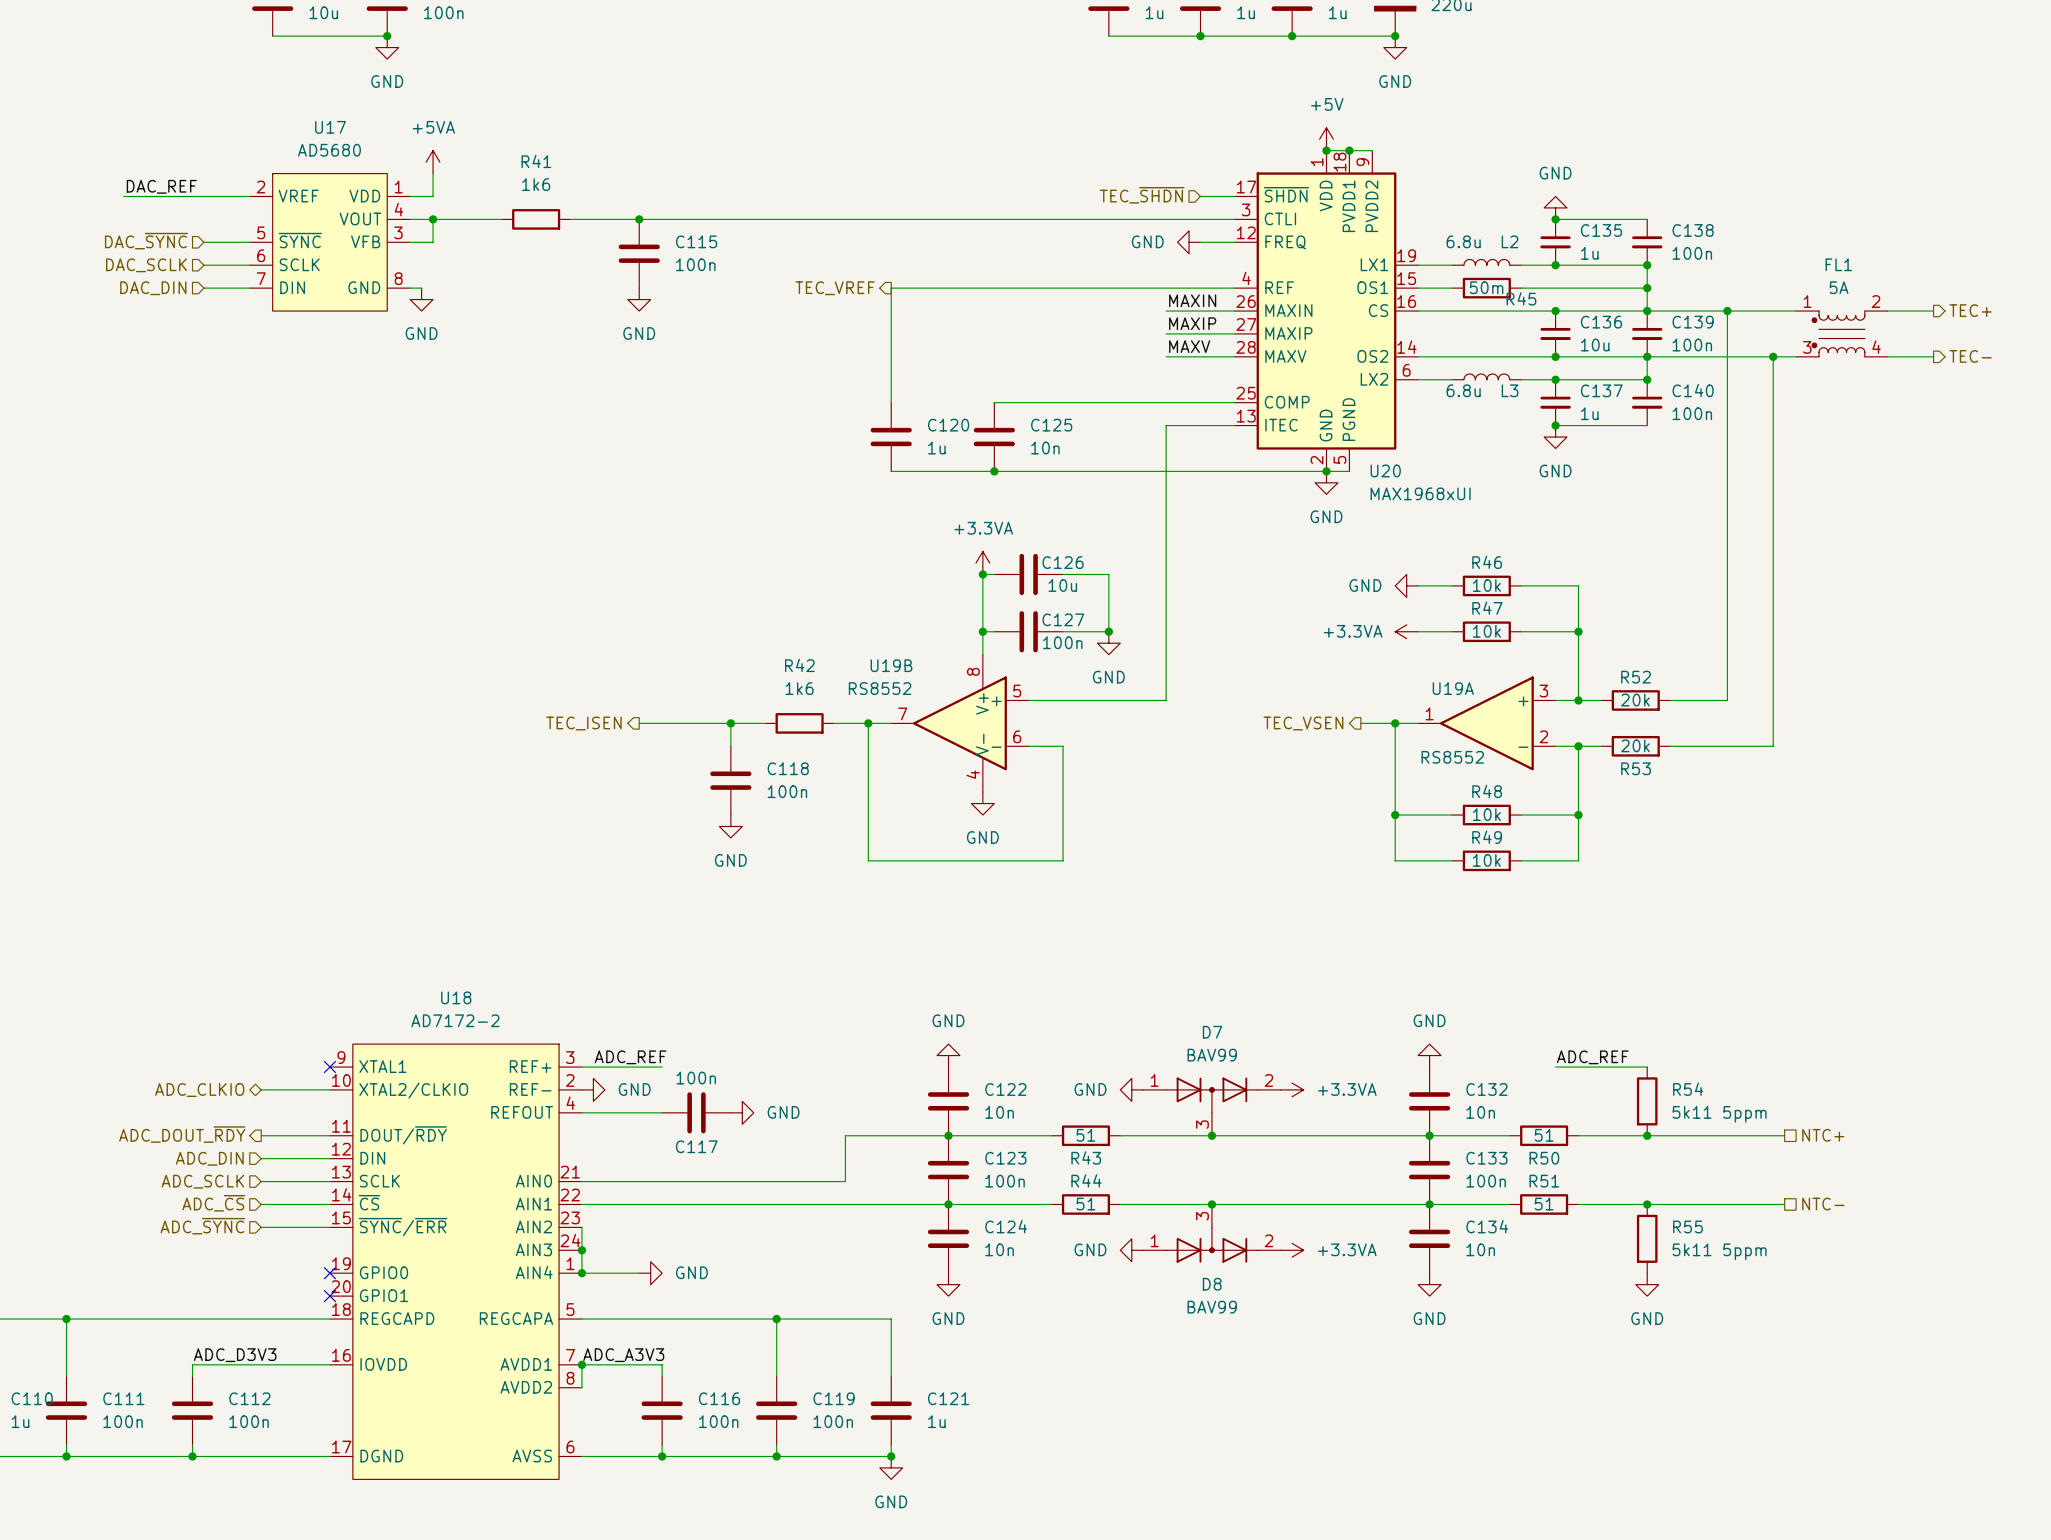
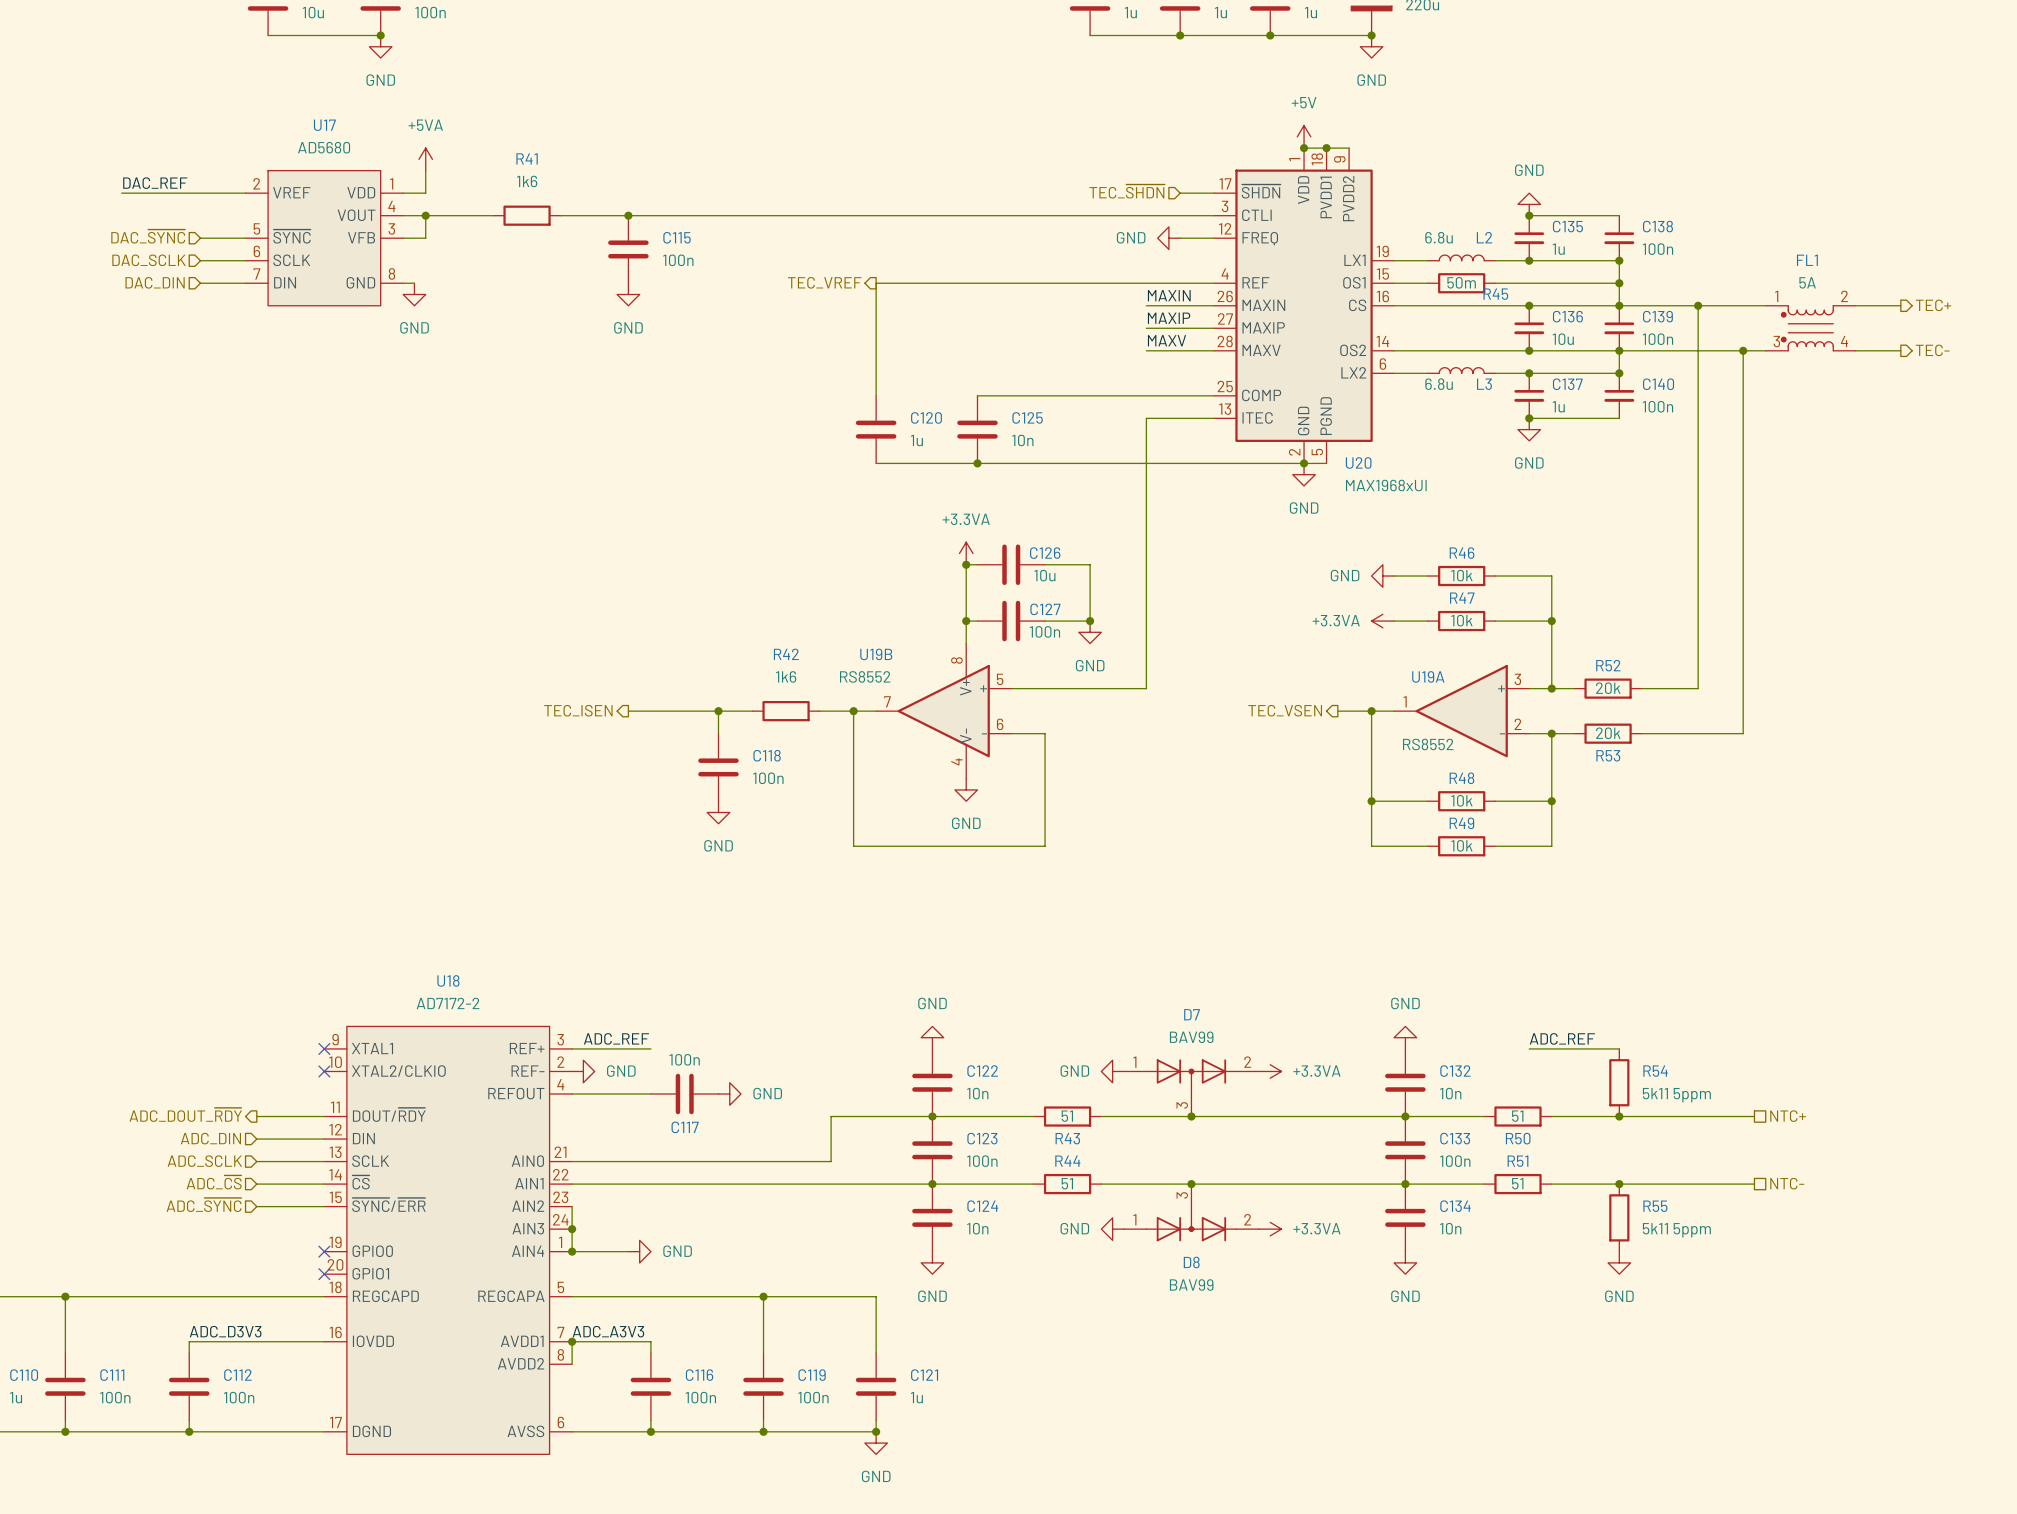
wire: (261, 1089) (329, 1089) -> none
no-connect mark: none -> (324, 1071)
hierarchical label: ADC_CLKIO (199, 1090) -> none

